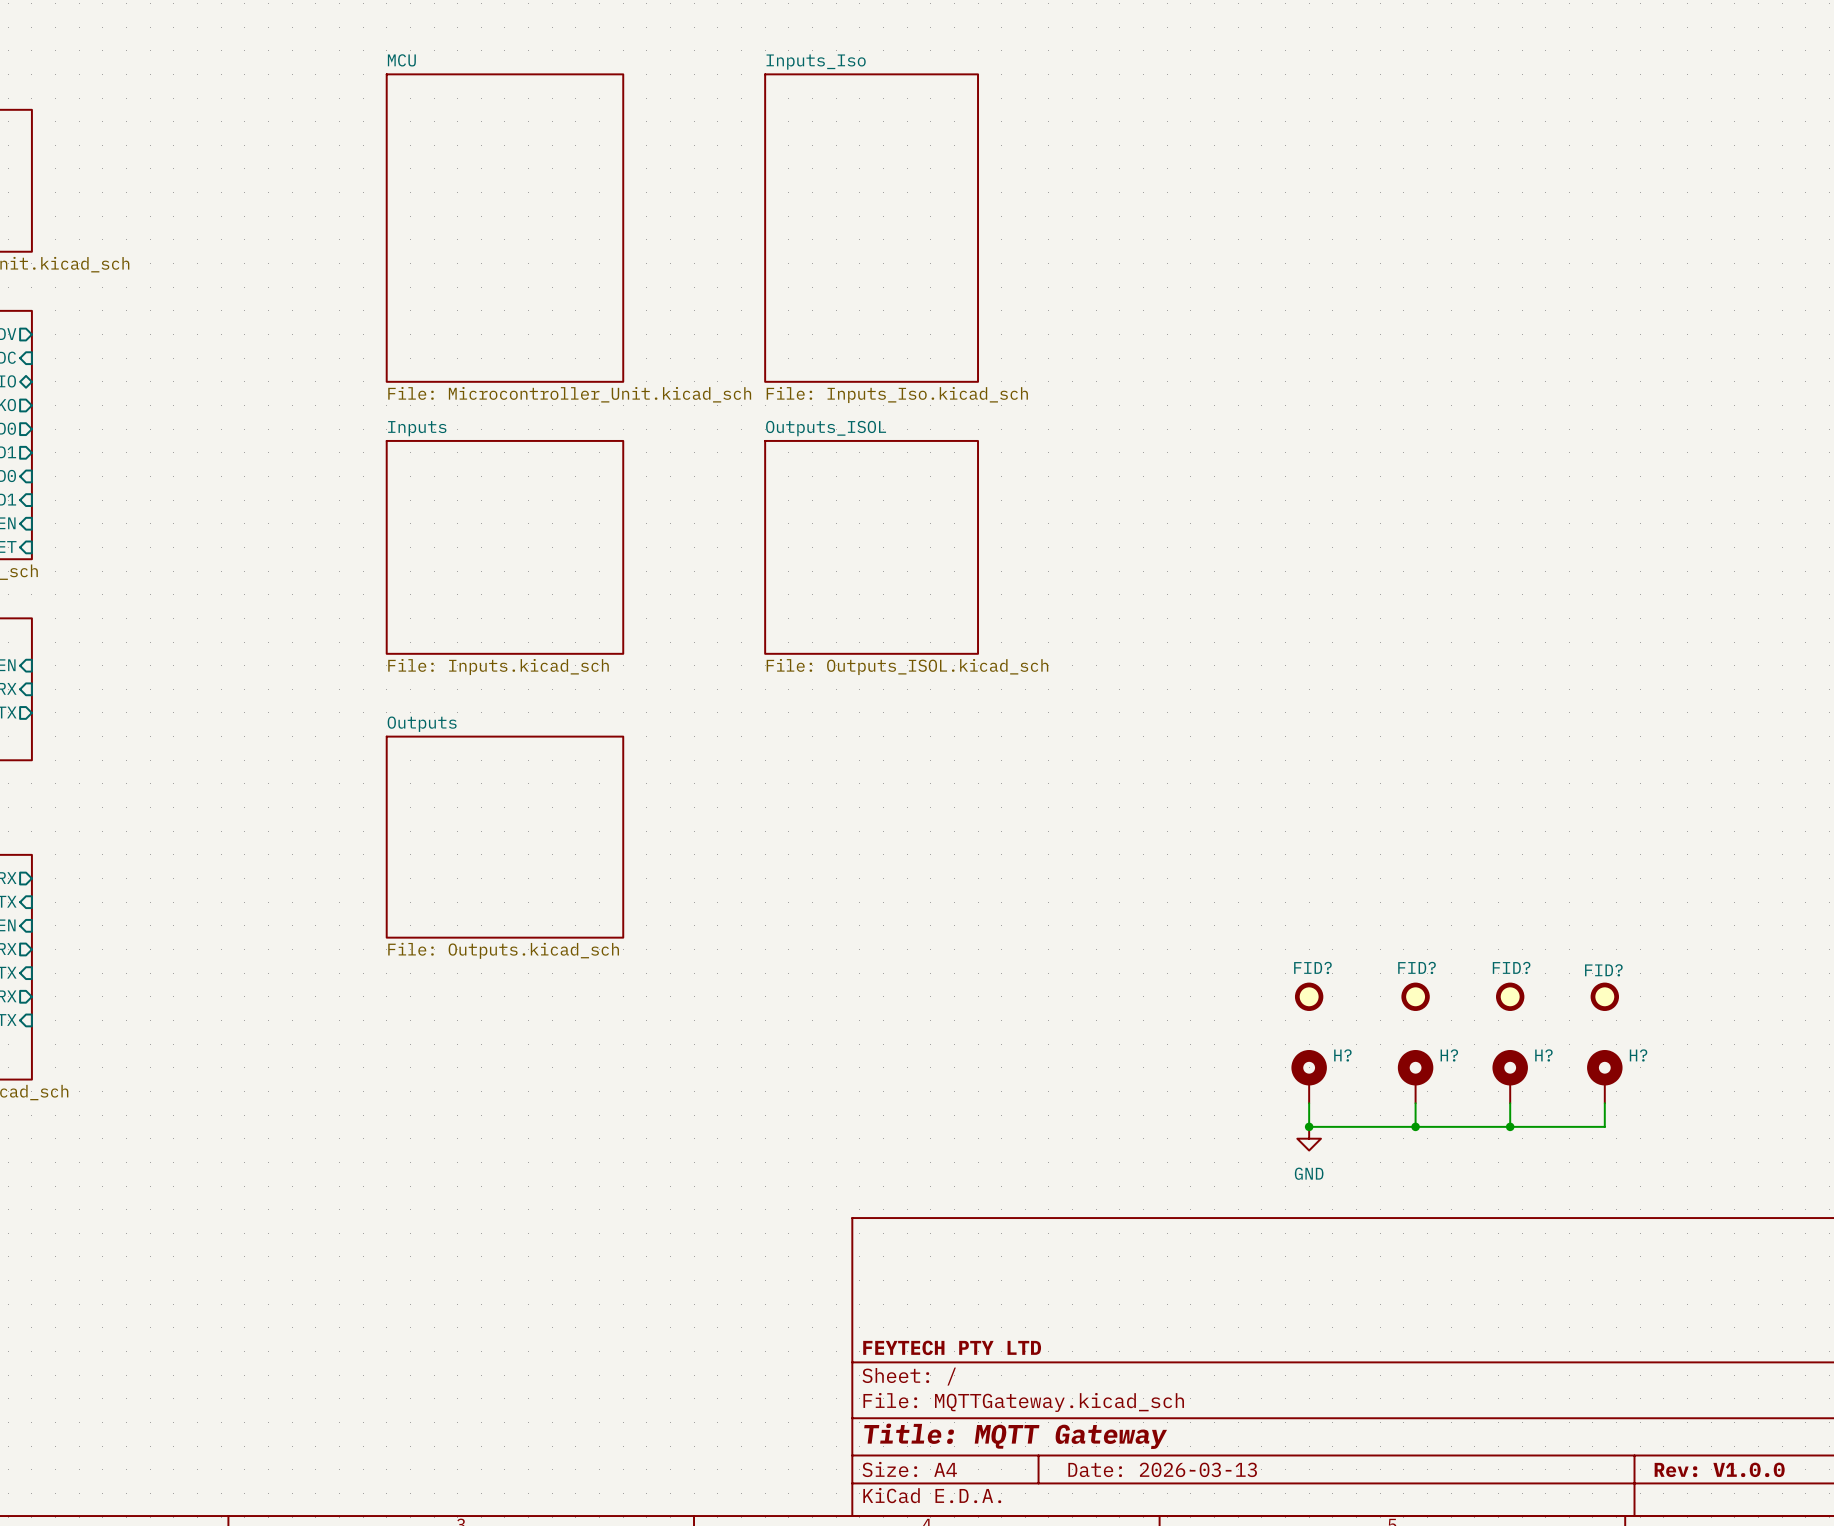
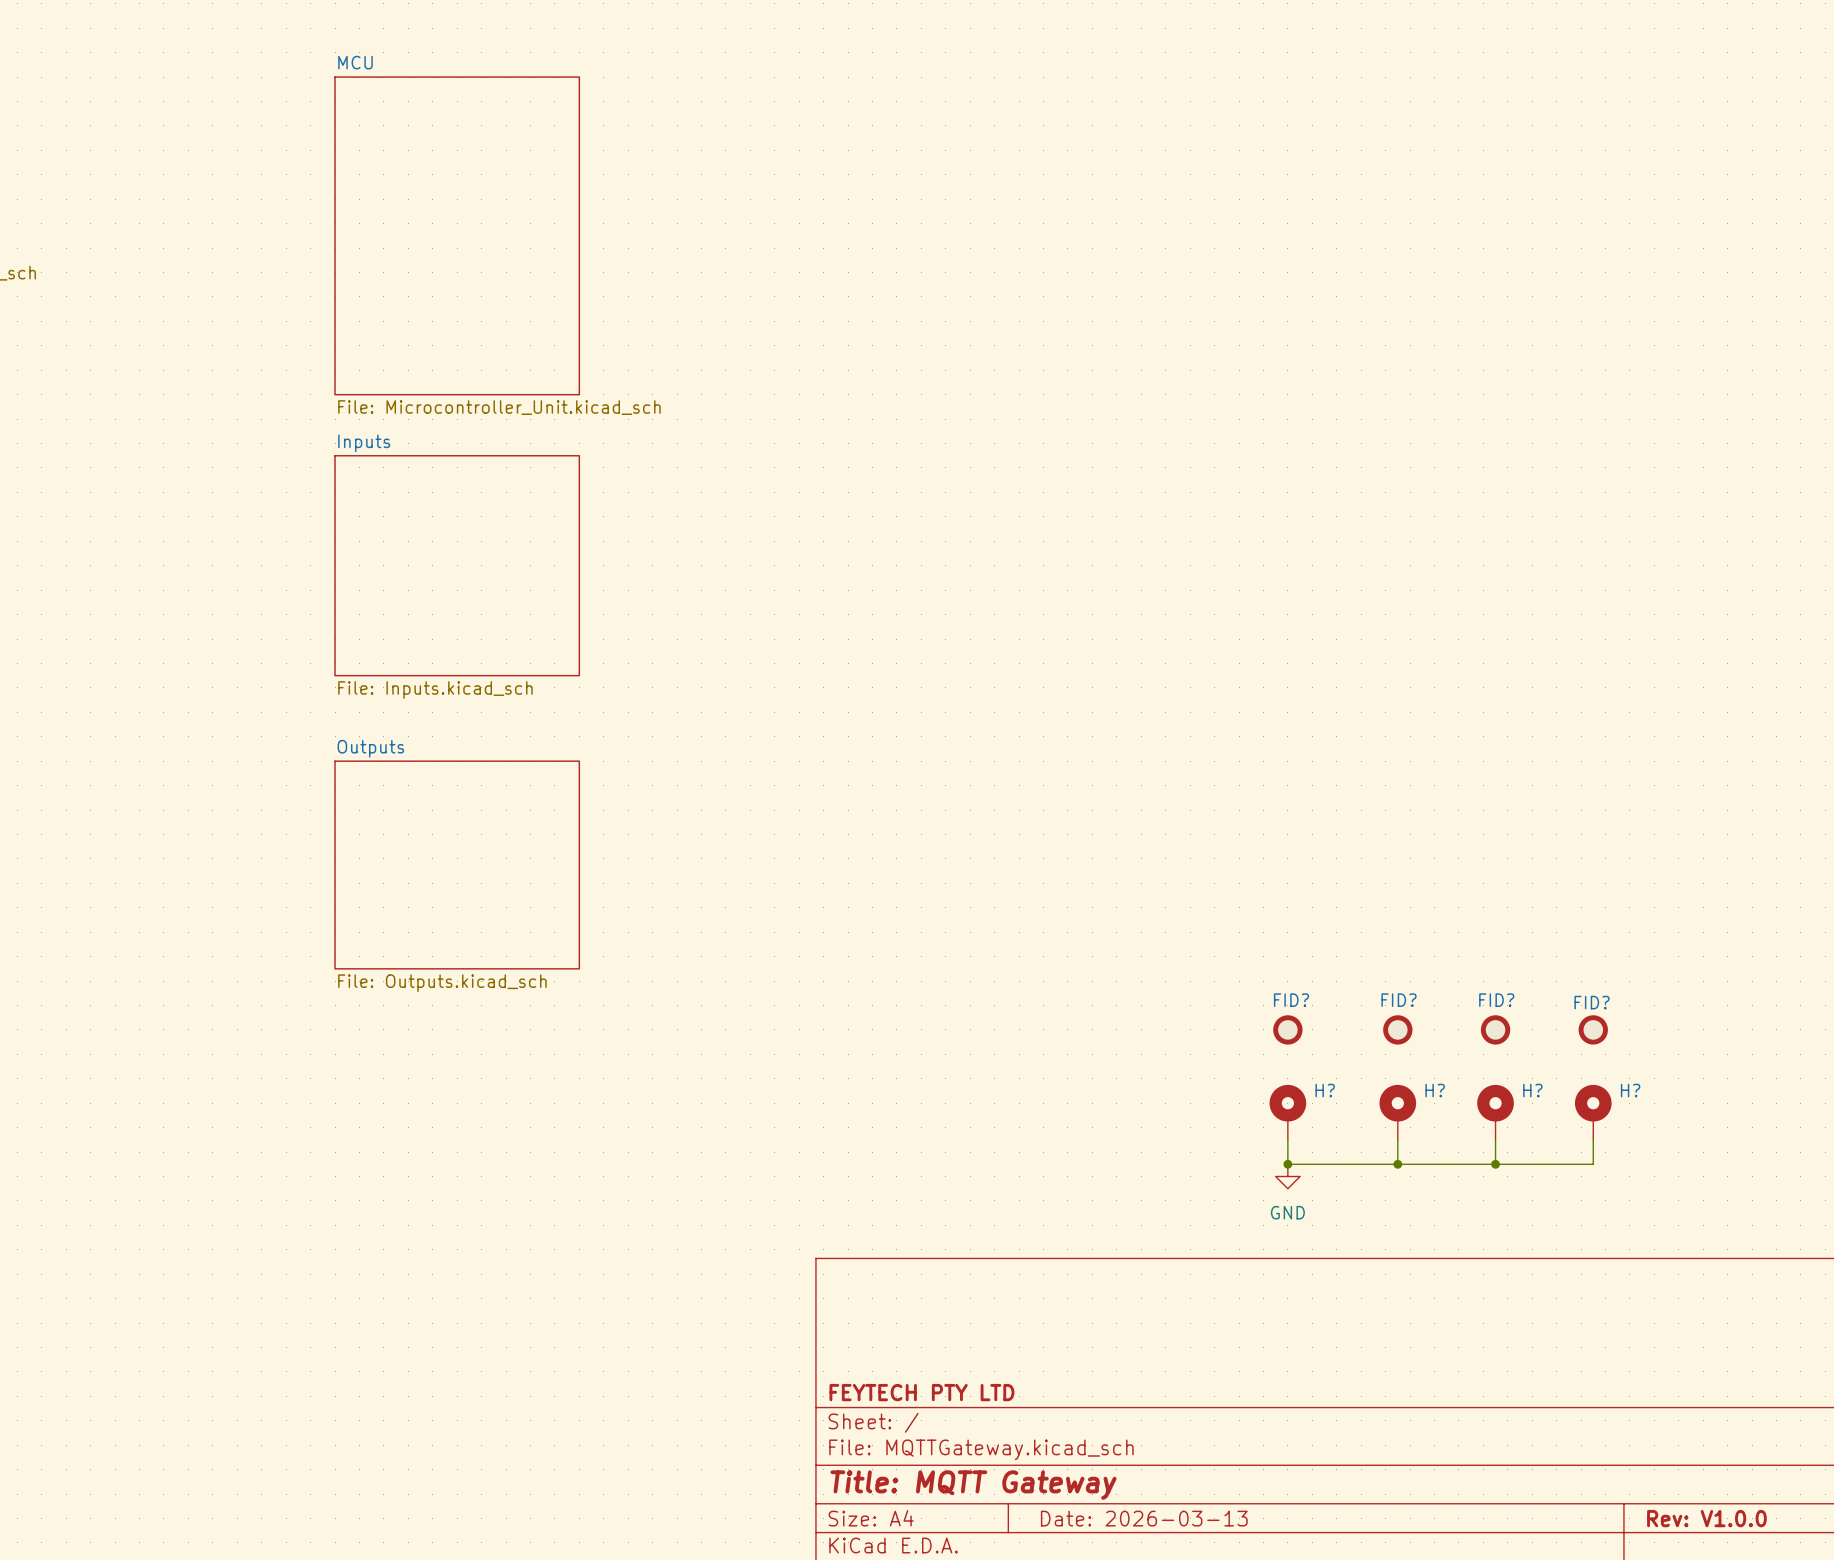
sheet Inputs_Iso: File: Inputs_Iso.kicad_sch (871, 228) -> none
sheet Outputs_ISOL: File: Outputs_ISOL.kicad_sch (871, 547) -> none

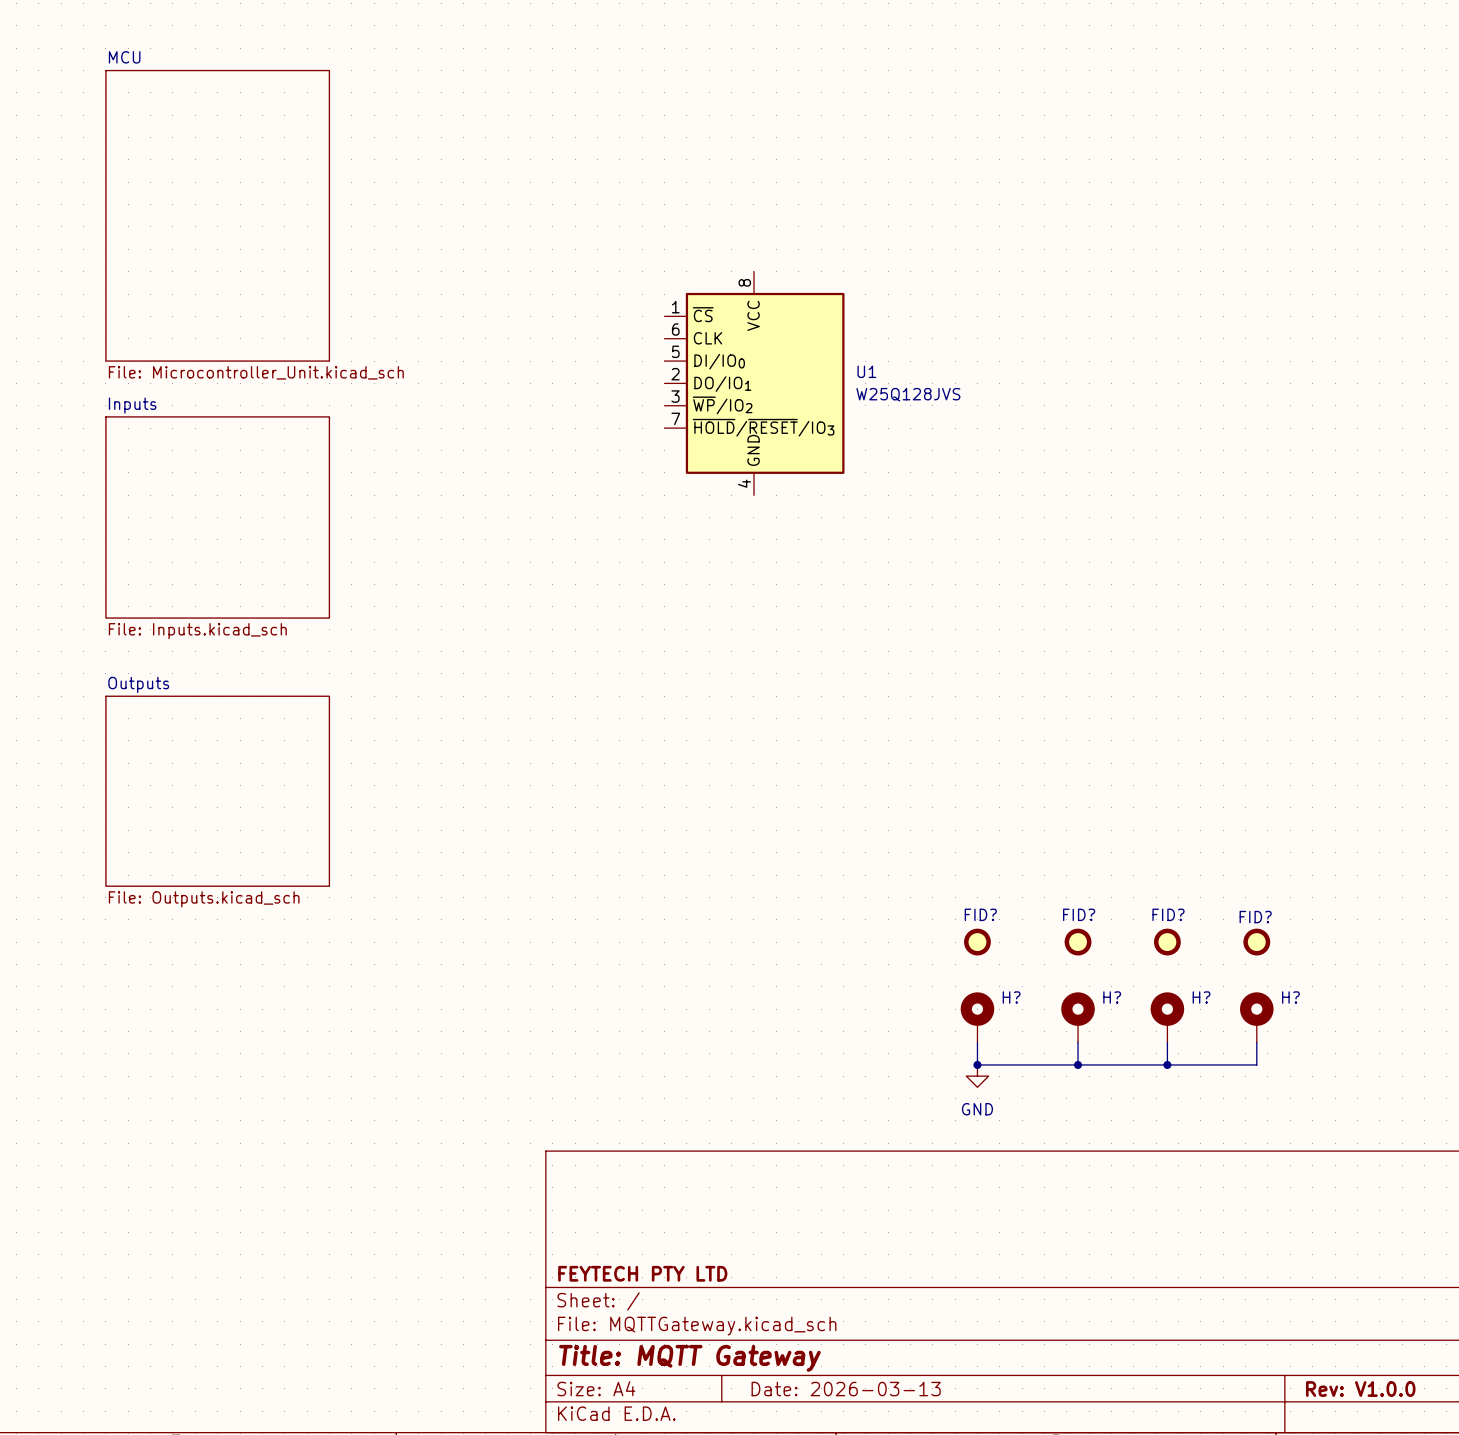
U1: none -> W25Q128JVS (754, 383)

